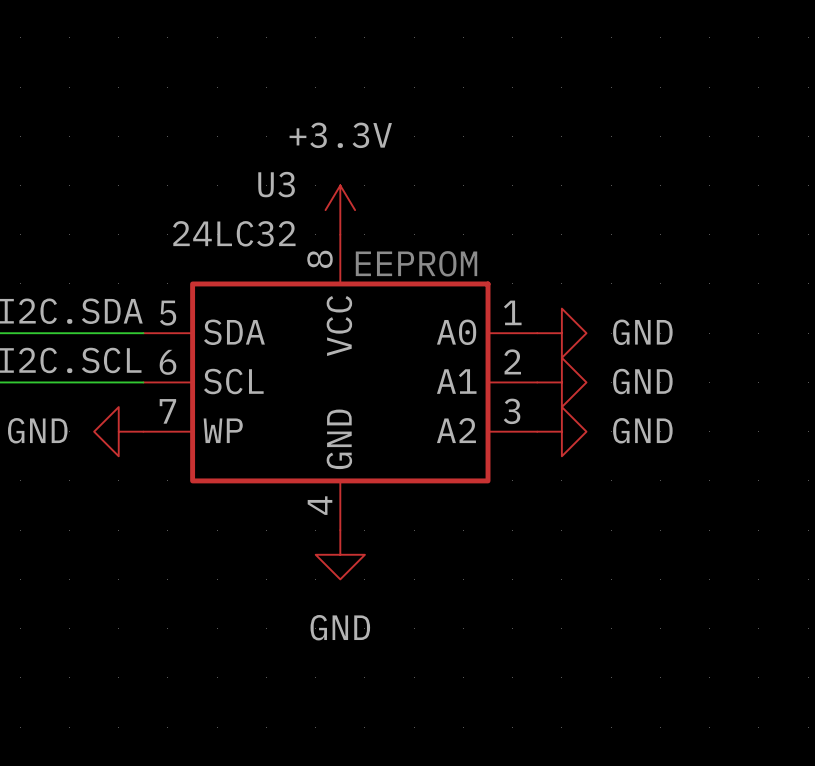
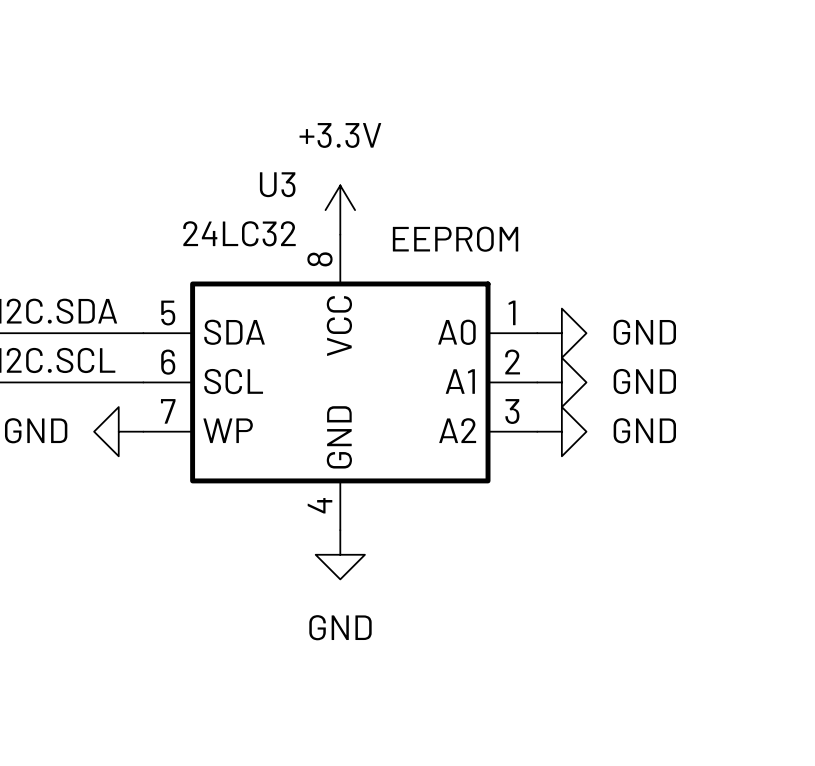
text position: EEPROM (416, 263) -> EEPROM (455, 239)

